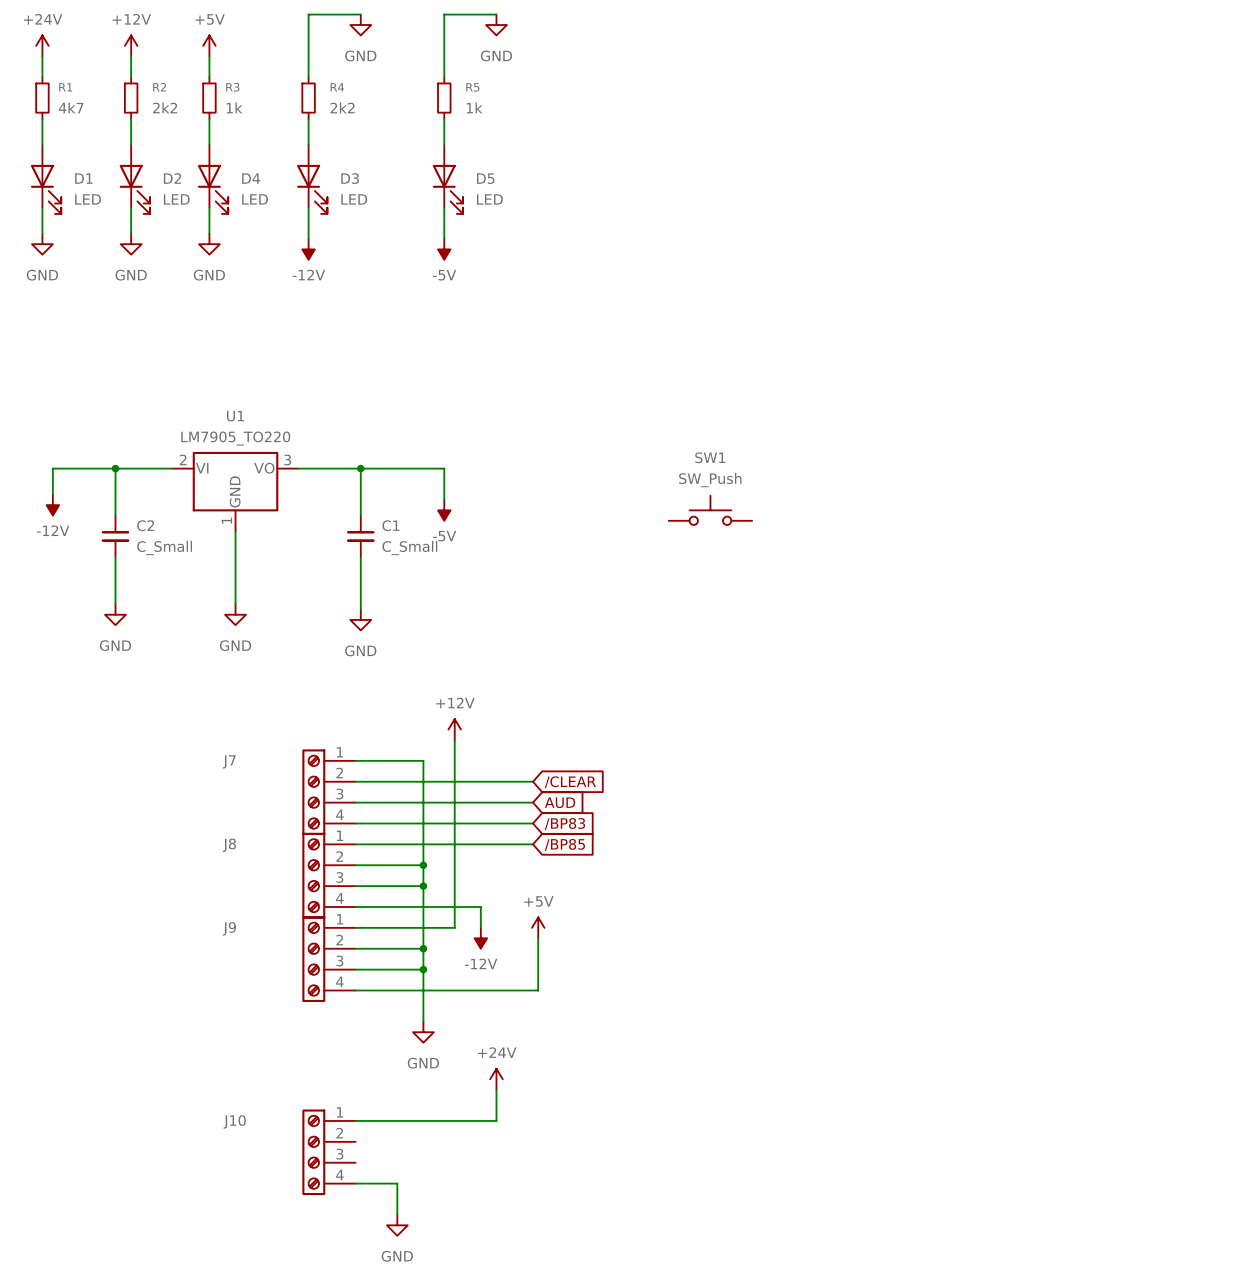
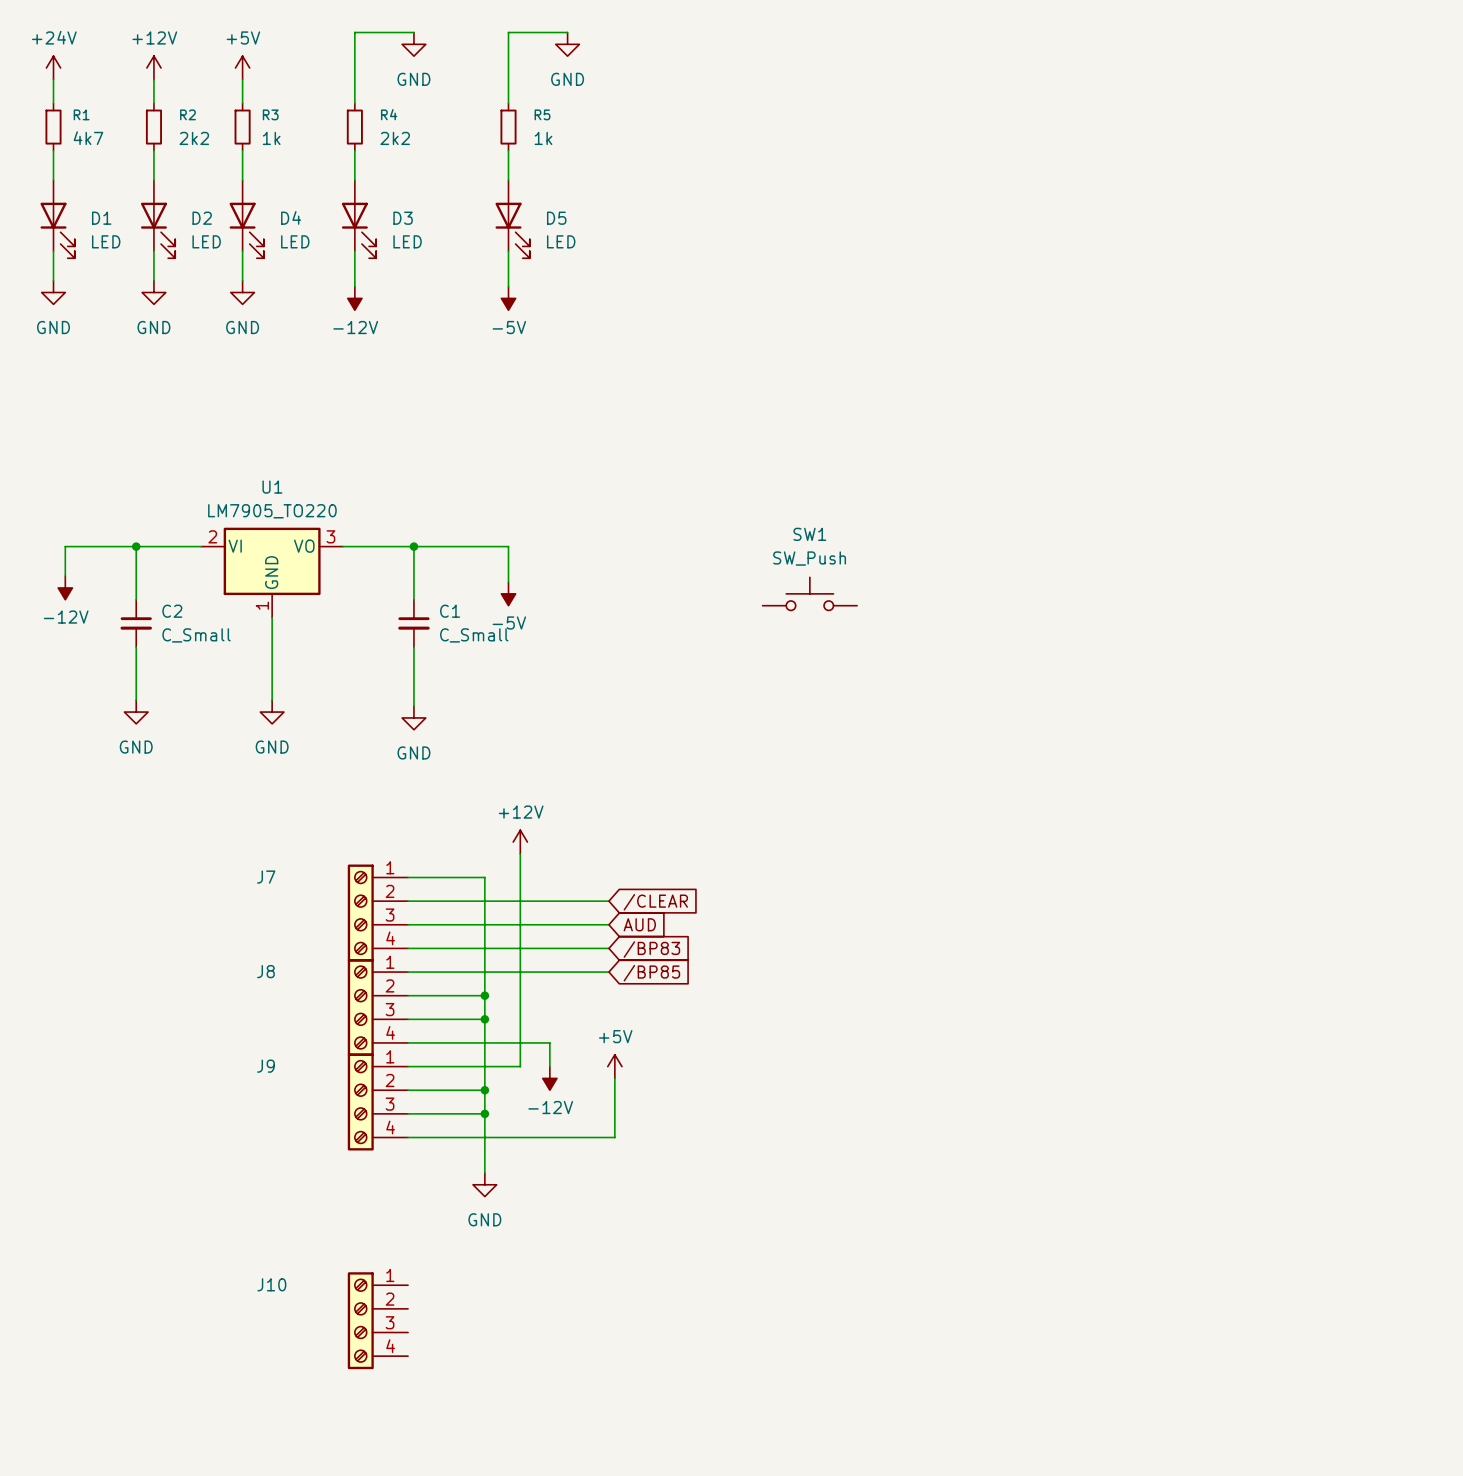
power symbol: +24V (496, 1079) -> none
wire: (496, 1089) (496, 1120) (355, 1120) -> none
wire: (355, 1183) (397, 1183) (397, 1214) -> none
power symbol: GND (397, 1225) -> none

